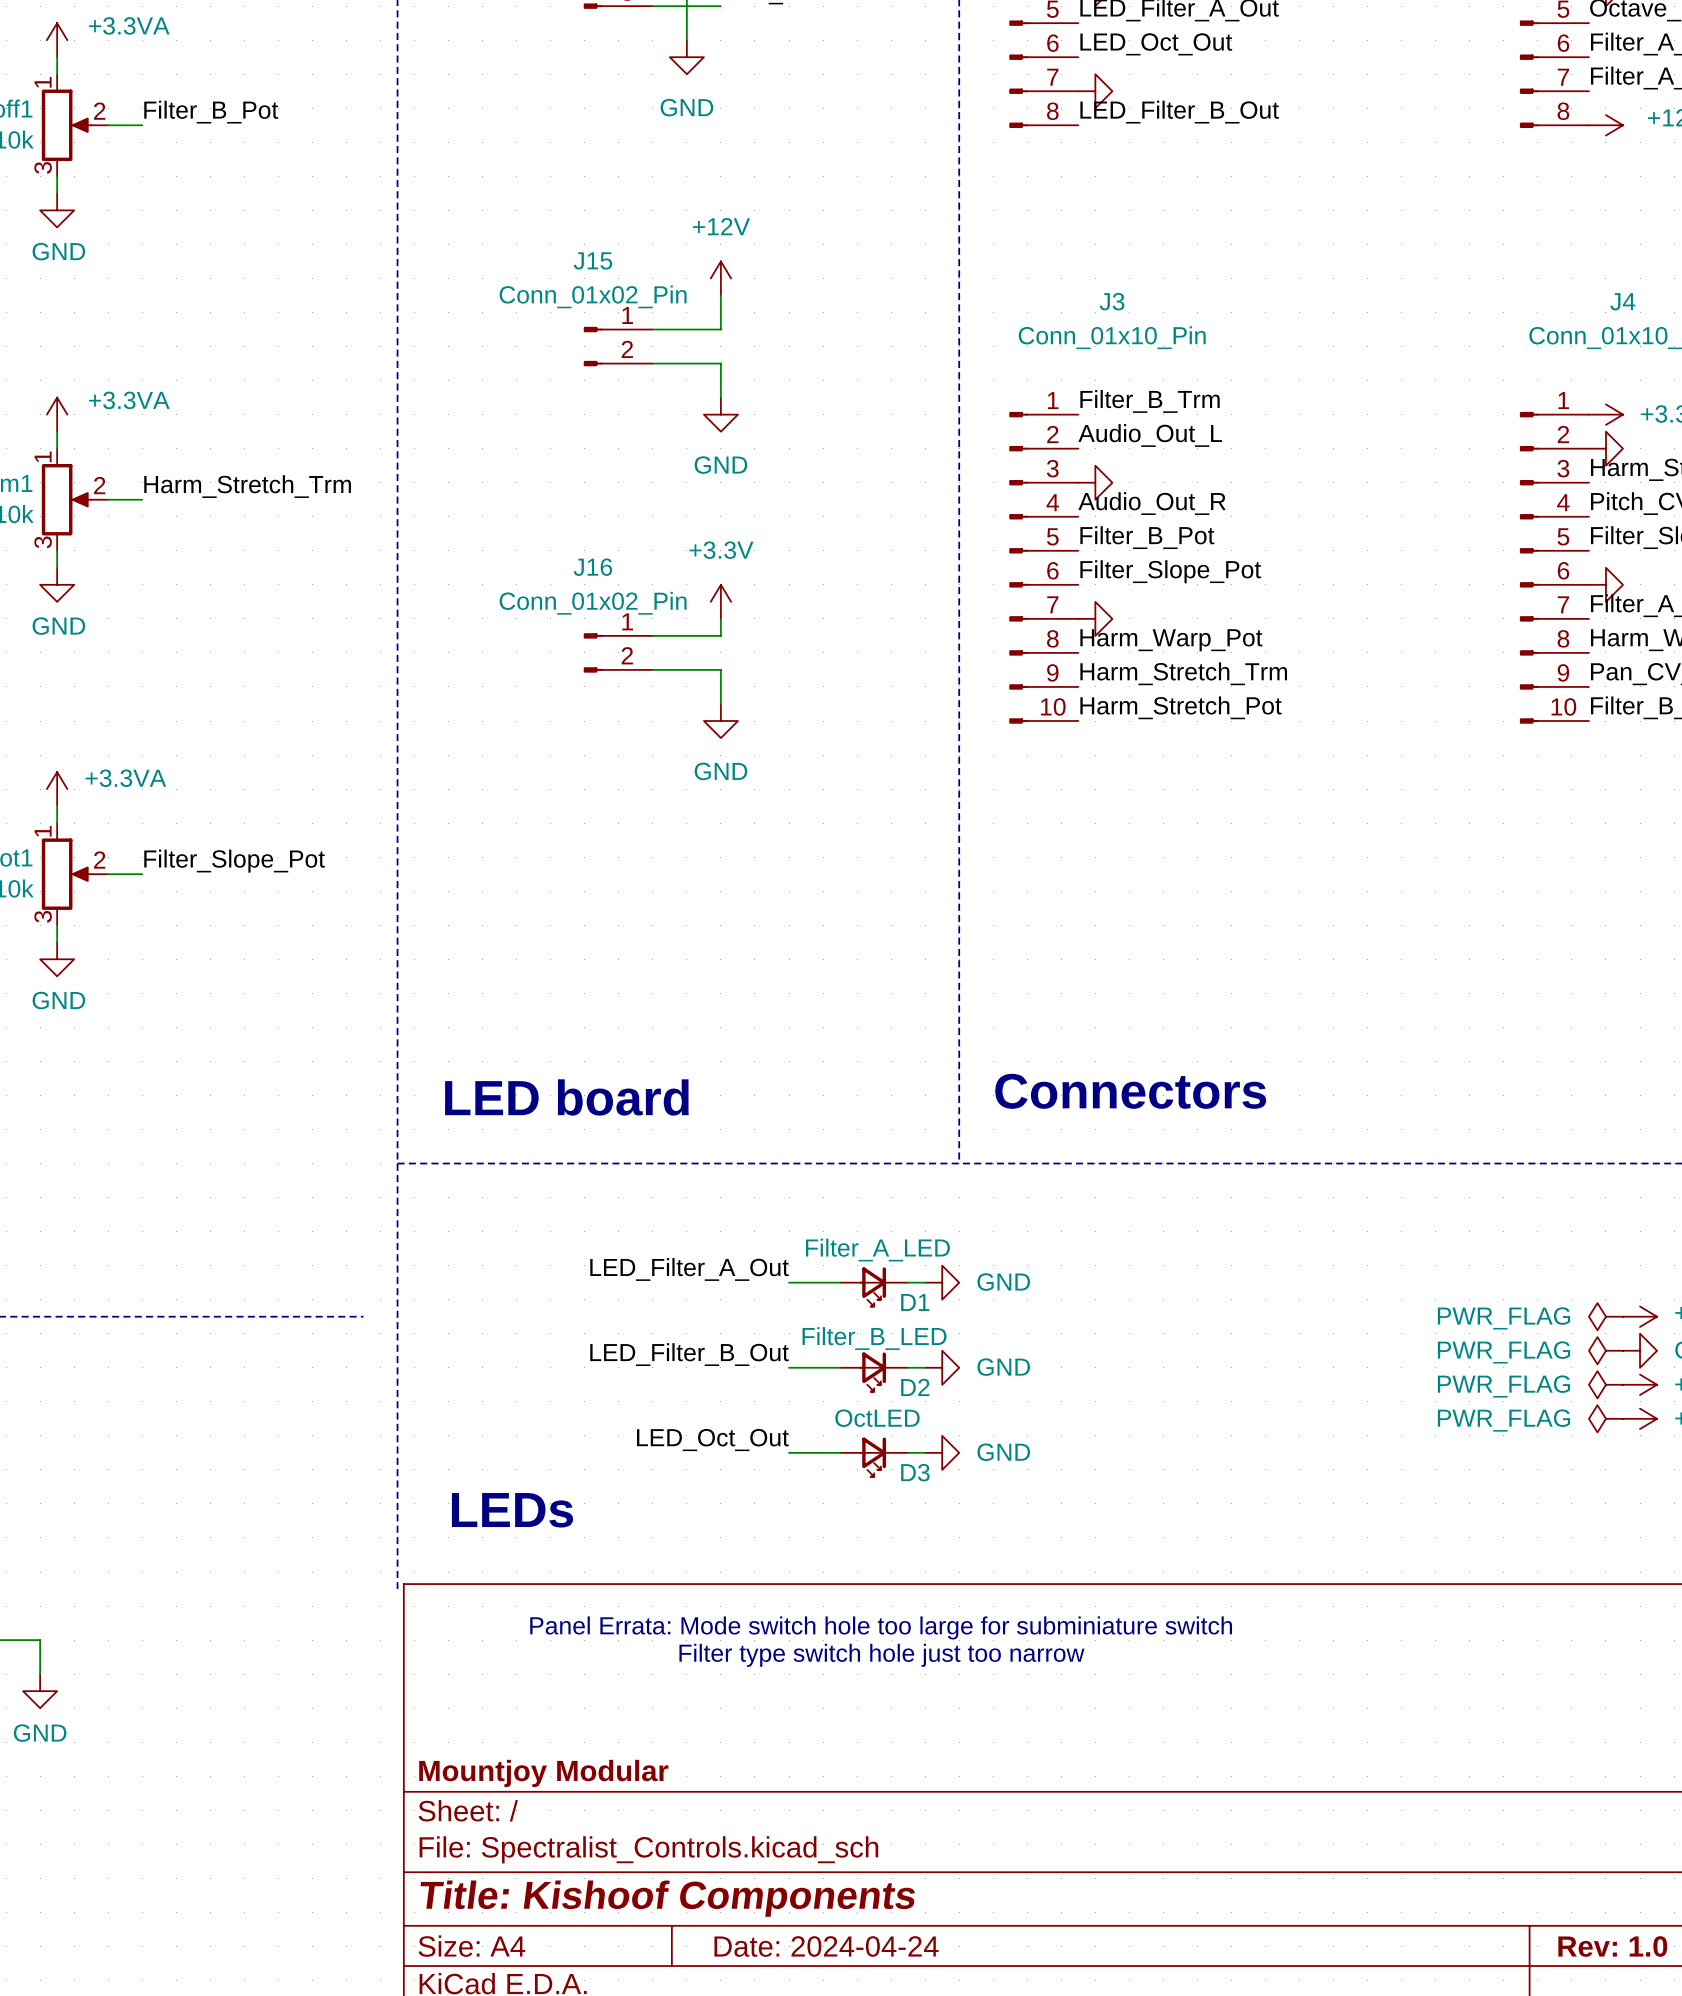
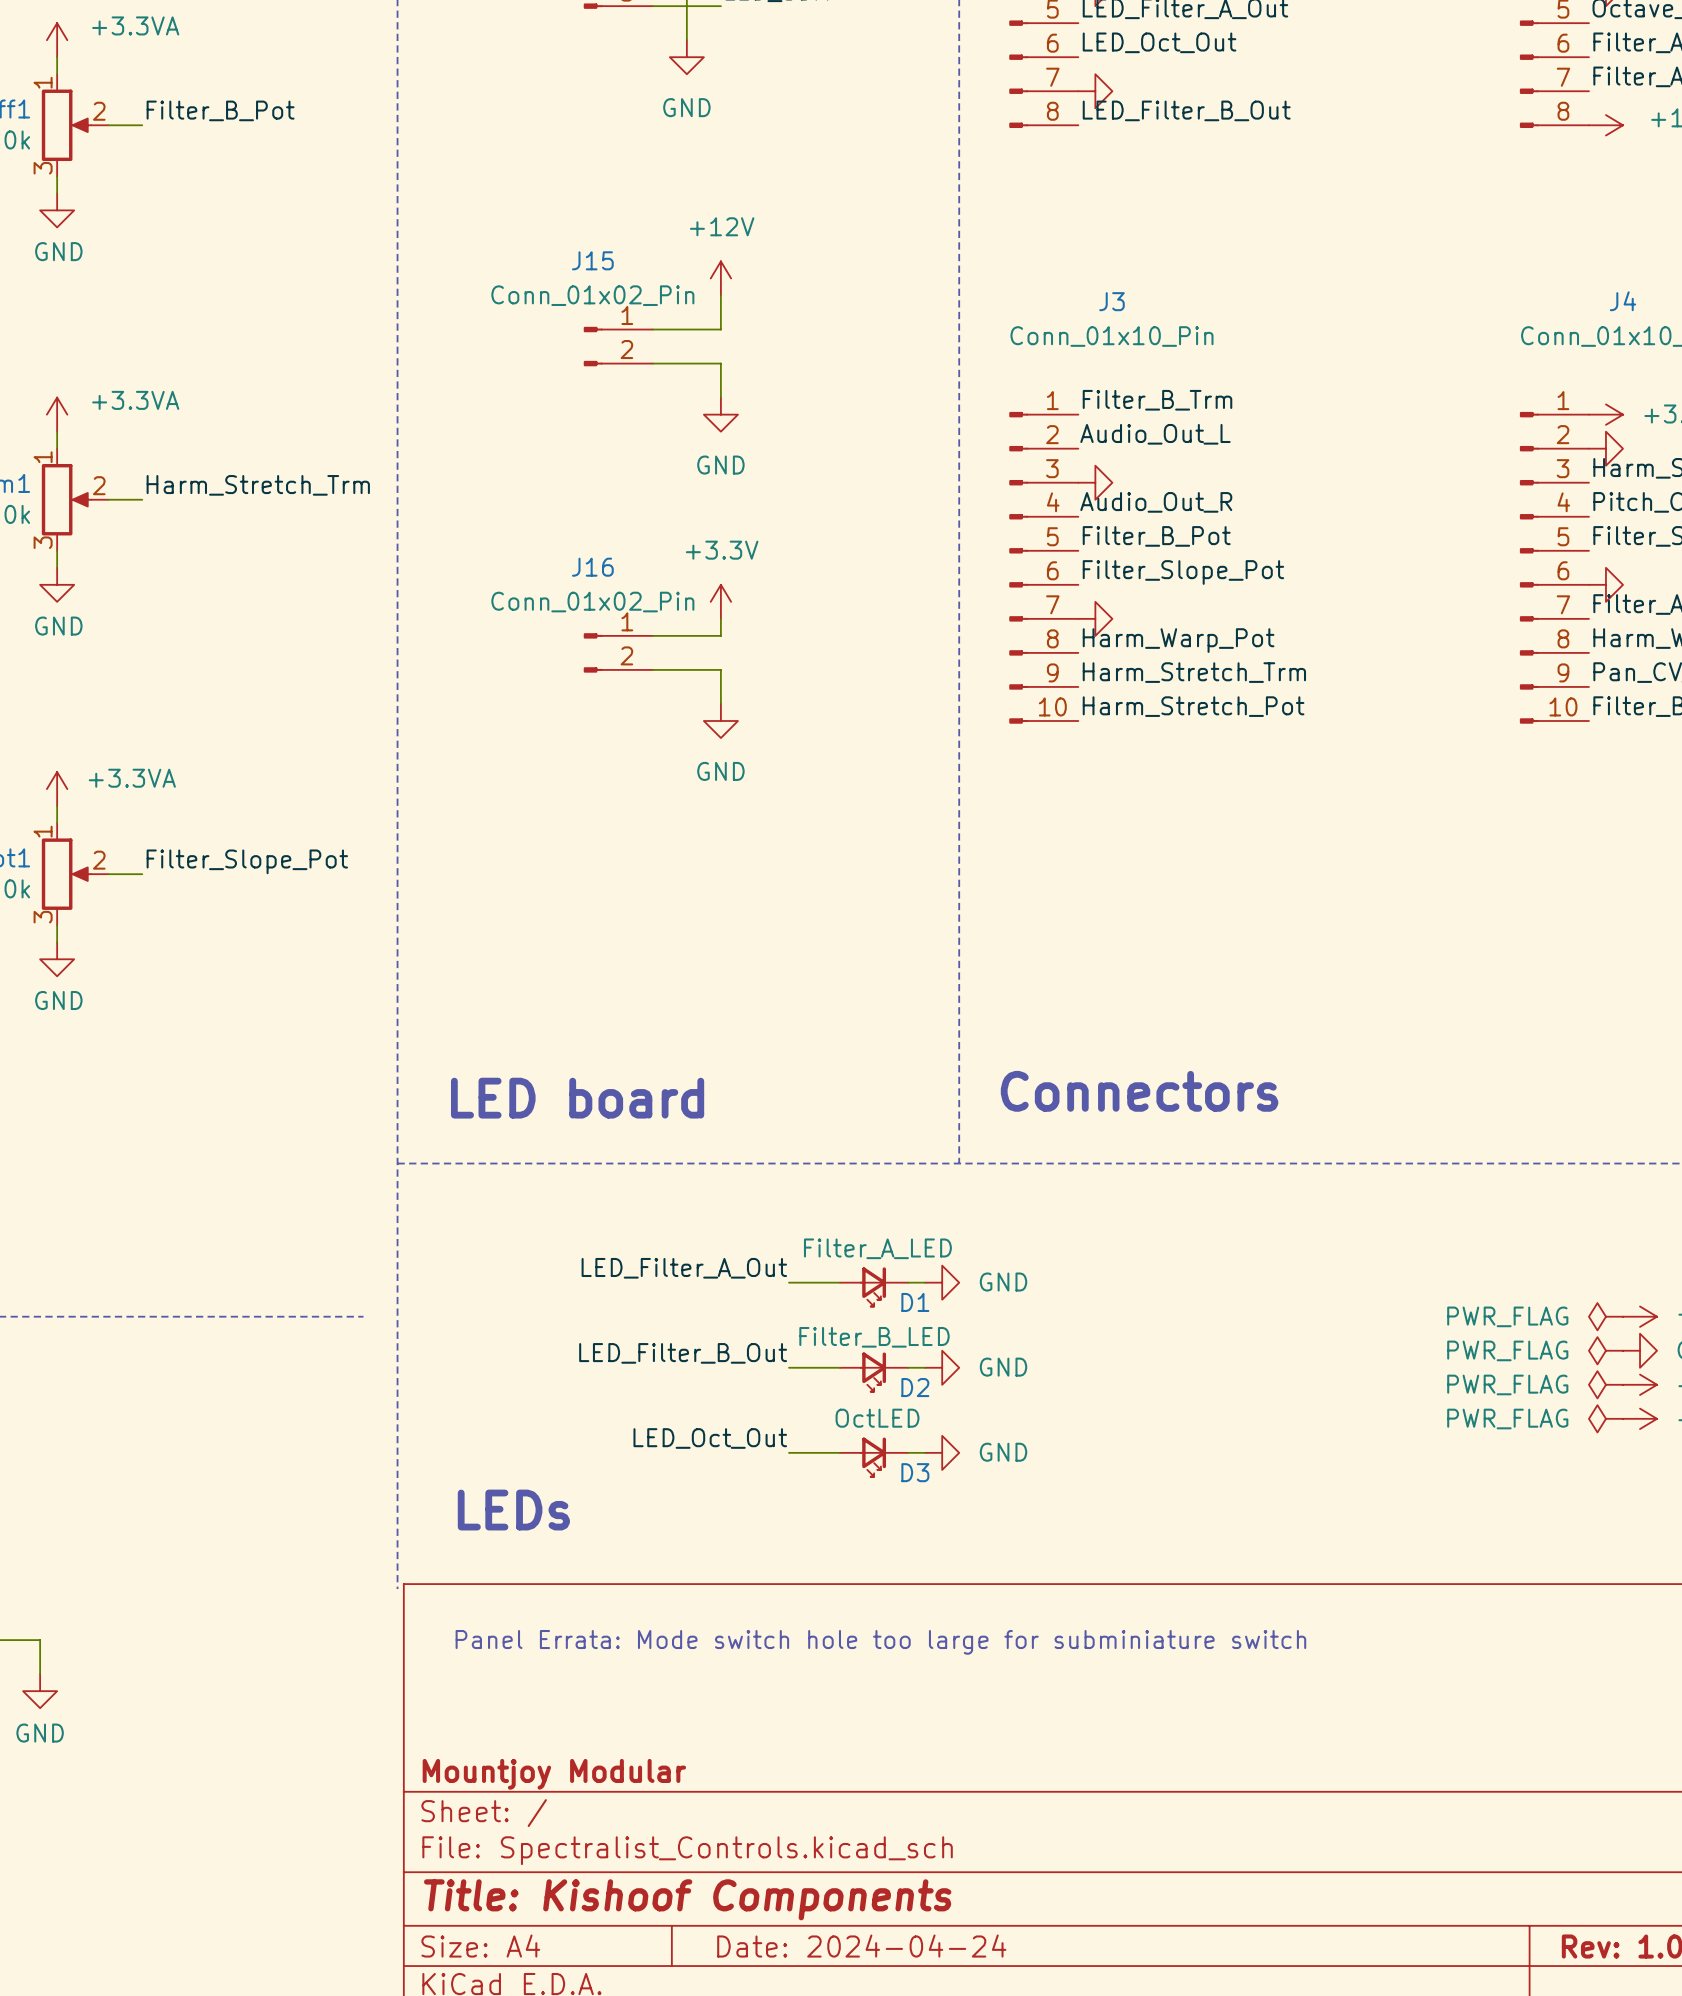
text position: Panel Errata: Mode switch hole too large for subminiature switch (881, 1627) -> Panel Errata: Mode switch hole too large for subminiature switch (880, 1642)
text: Filter type switch hole just too narrow (881, 1655) -> none

